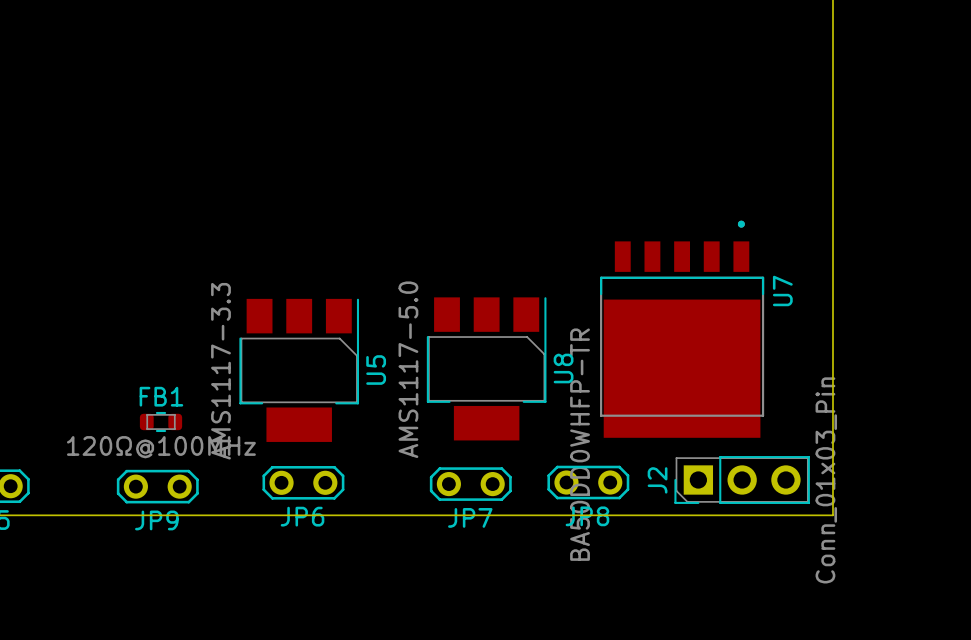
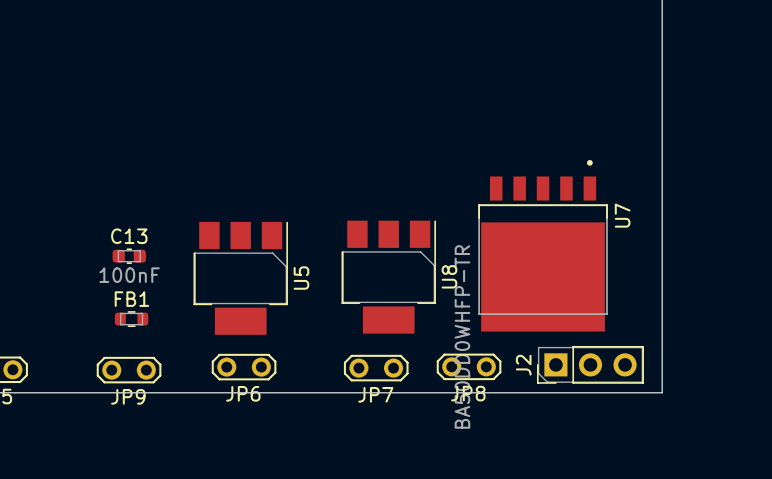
C13: none -> 100nF (129, 256)
U8 value: AMS1117-5.0 (408, 369) -> none
U5 value: AMS1117-3.3 (220, 371) -> none
FB1 value: 120Ω@100MHz (161, 447) -> none
J2 value: Conn_01x03_Pin (826, 480) -> none

